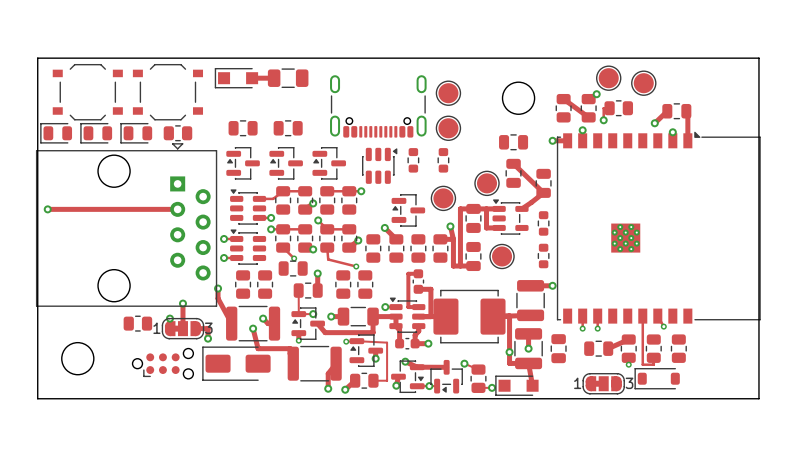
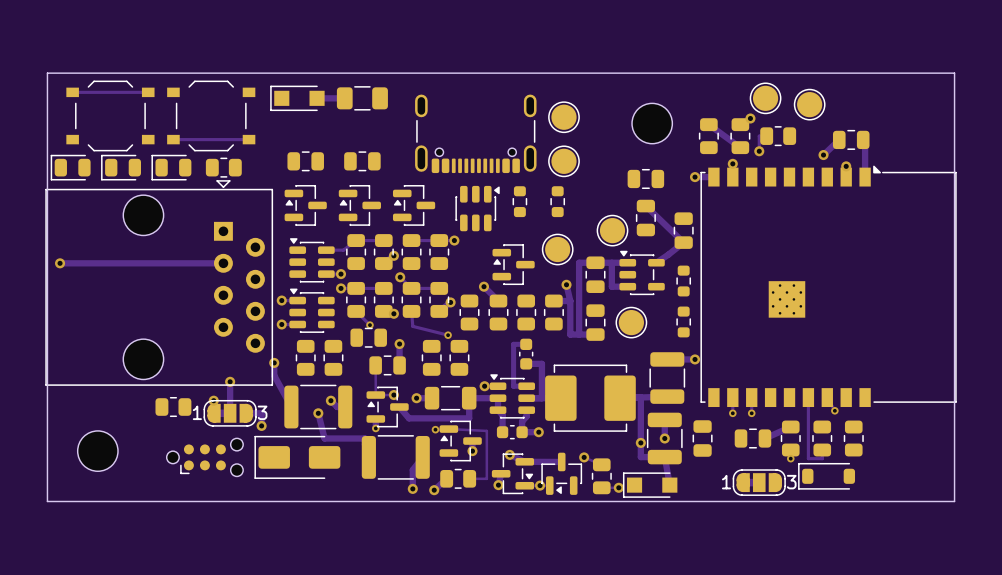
track: none -> (72, 92) (148, 92)
track: none -> (173, 139) (249, 139)

